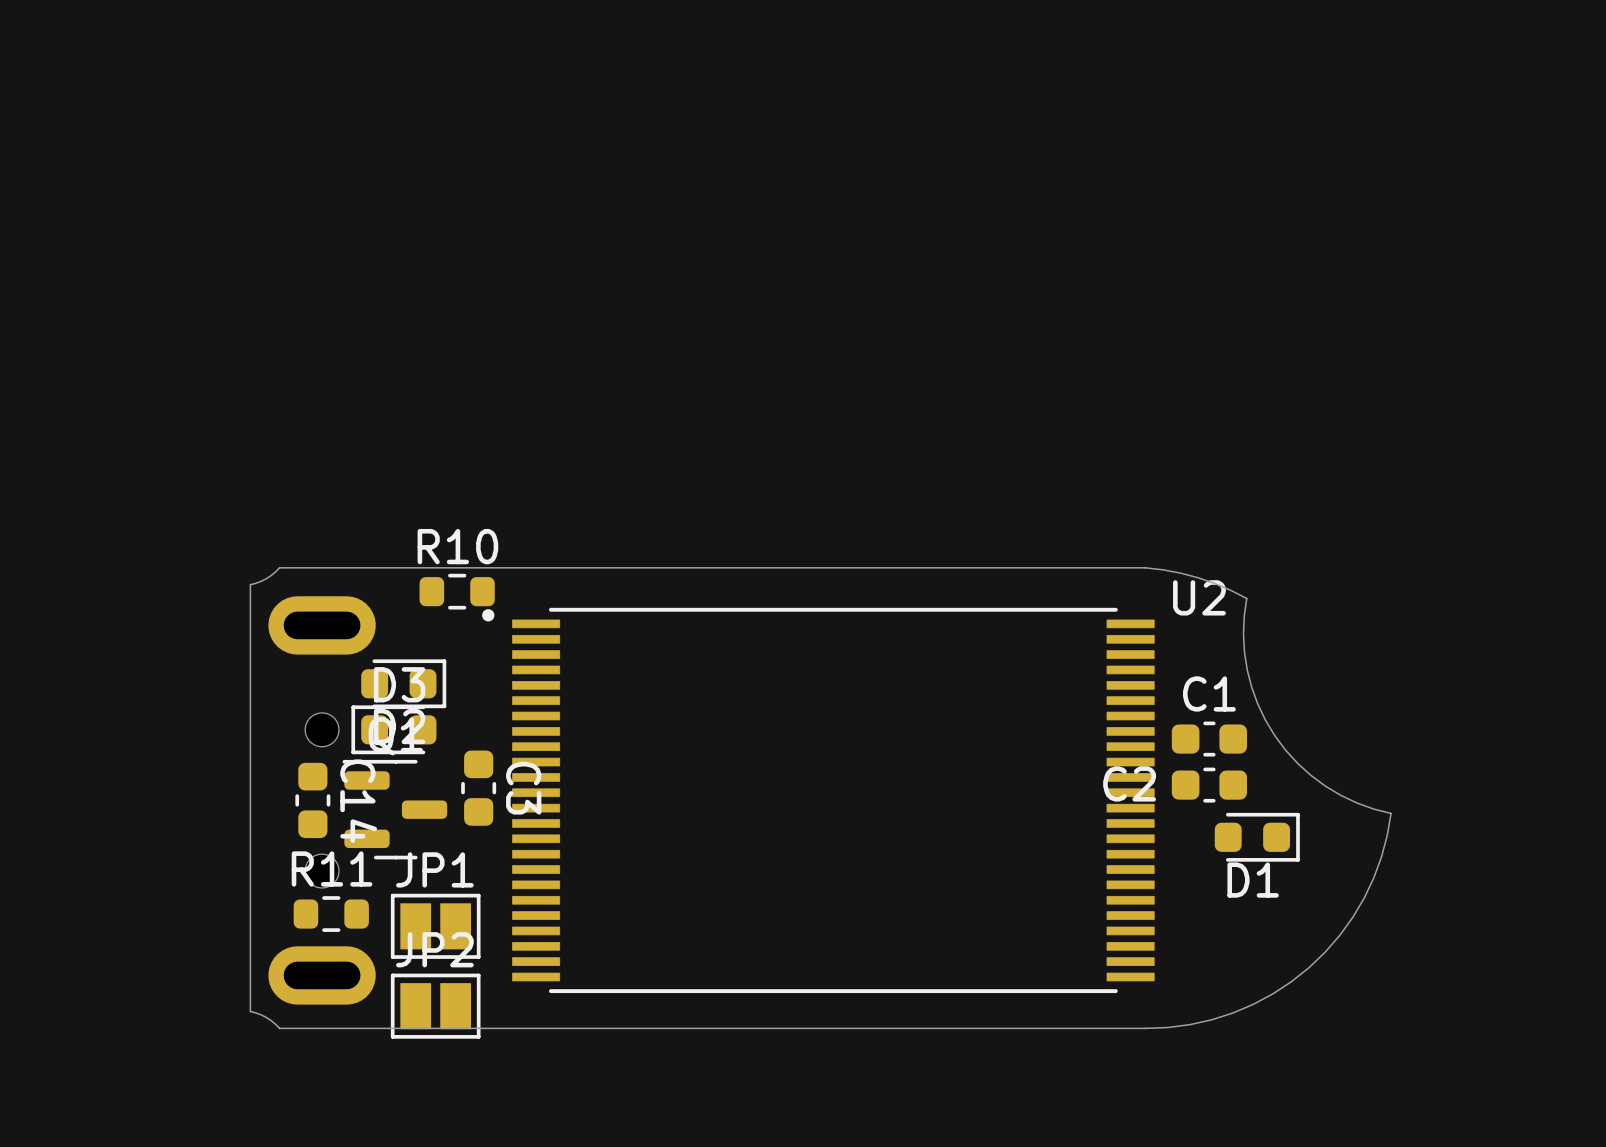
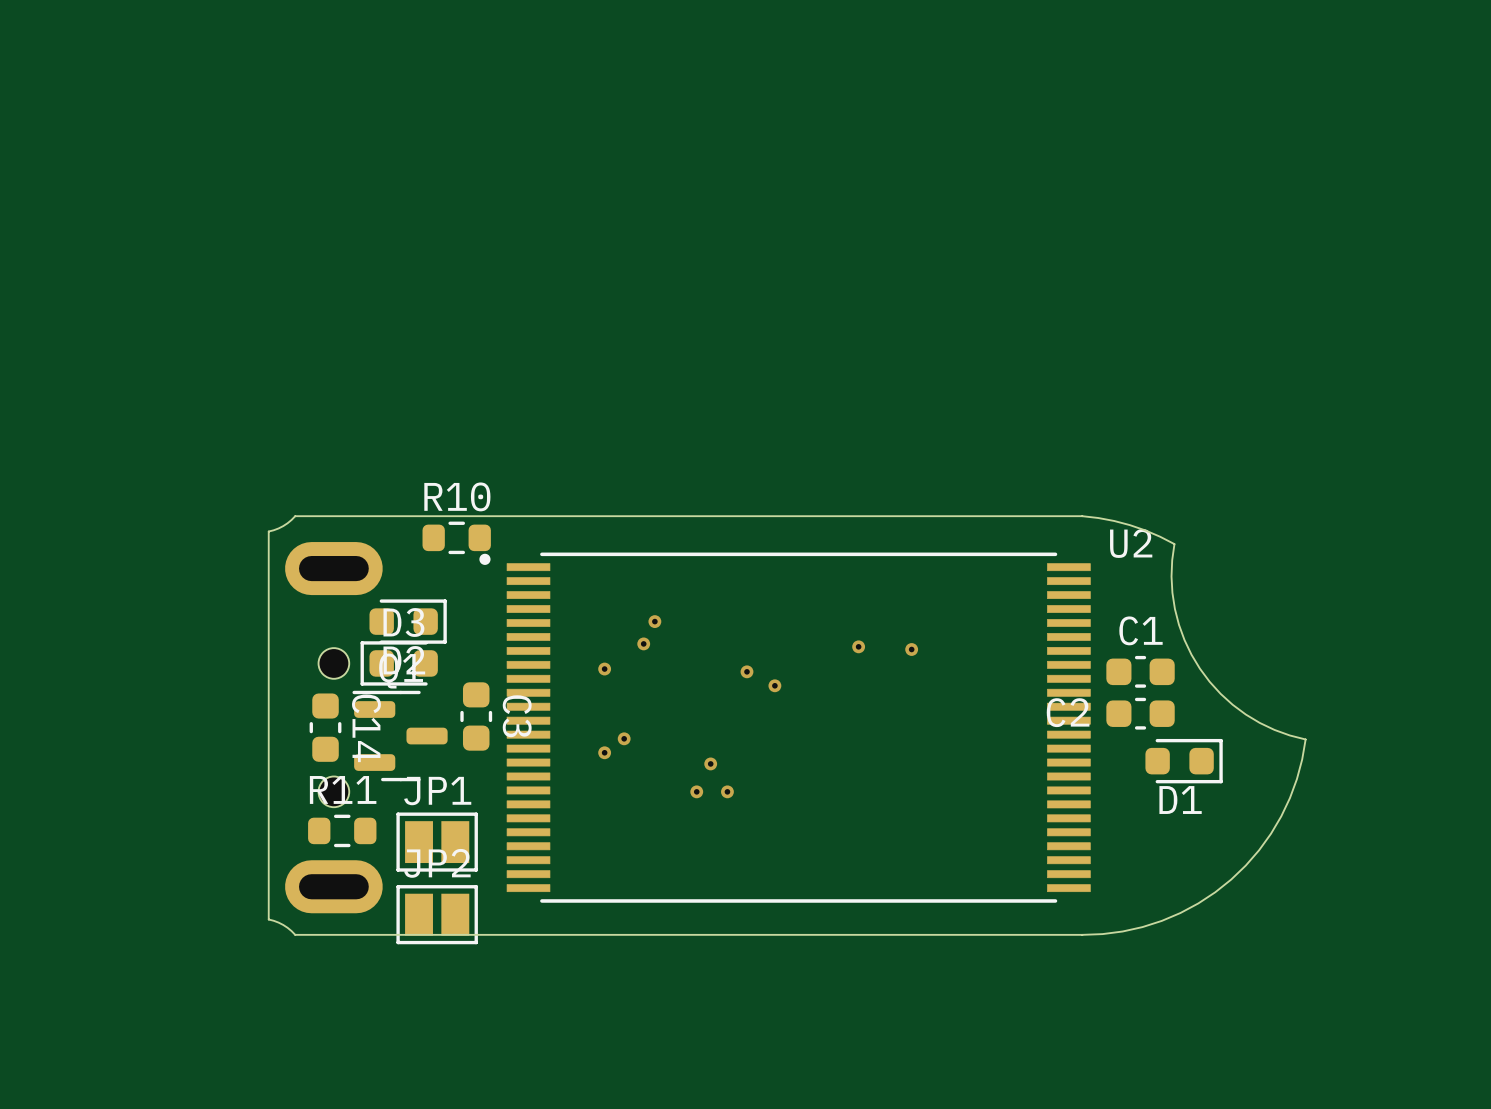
via: none -> (654, 621)
via: none -> (643, 643)
via: none -> (858, 646)
via: none -> (911, 649)
via: none -> (604, 669)
via: none -> (746, 671)
via: none -> (774, 685)
via: none -> (624, 738)
via: none -> (604, 752)
via: none -> (710, 763)
via: none -> (696, 791)
via: none -> (727, 791)

